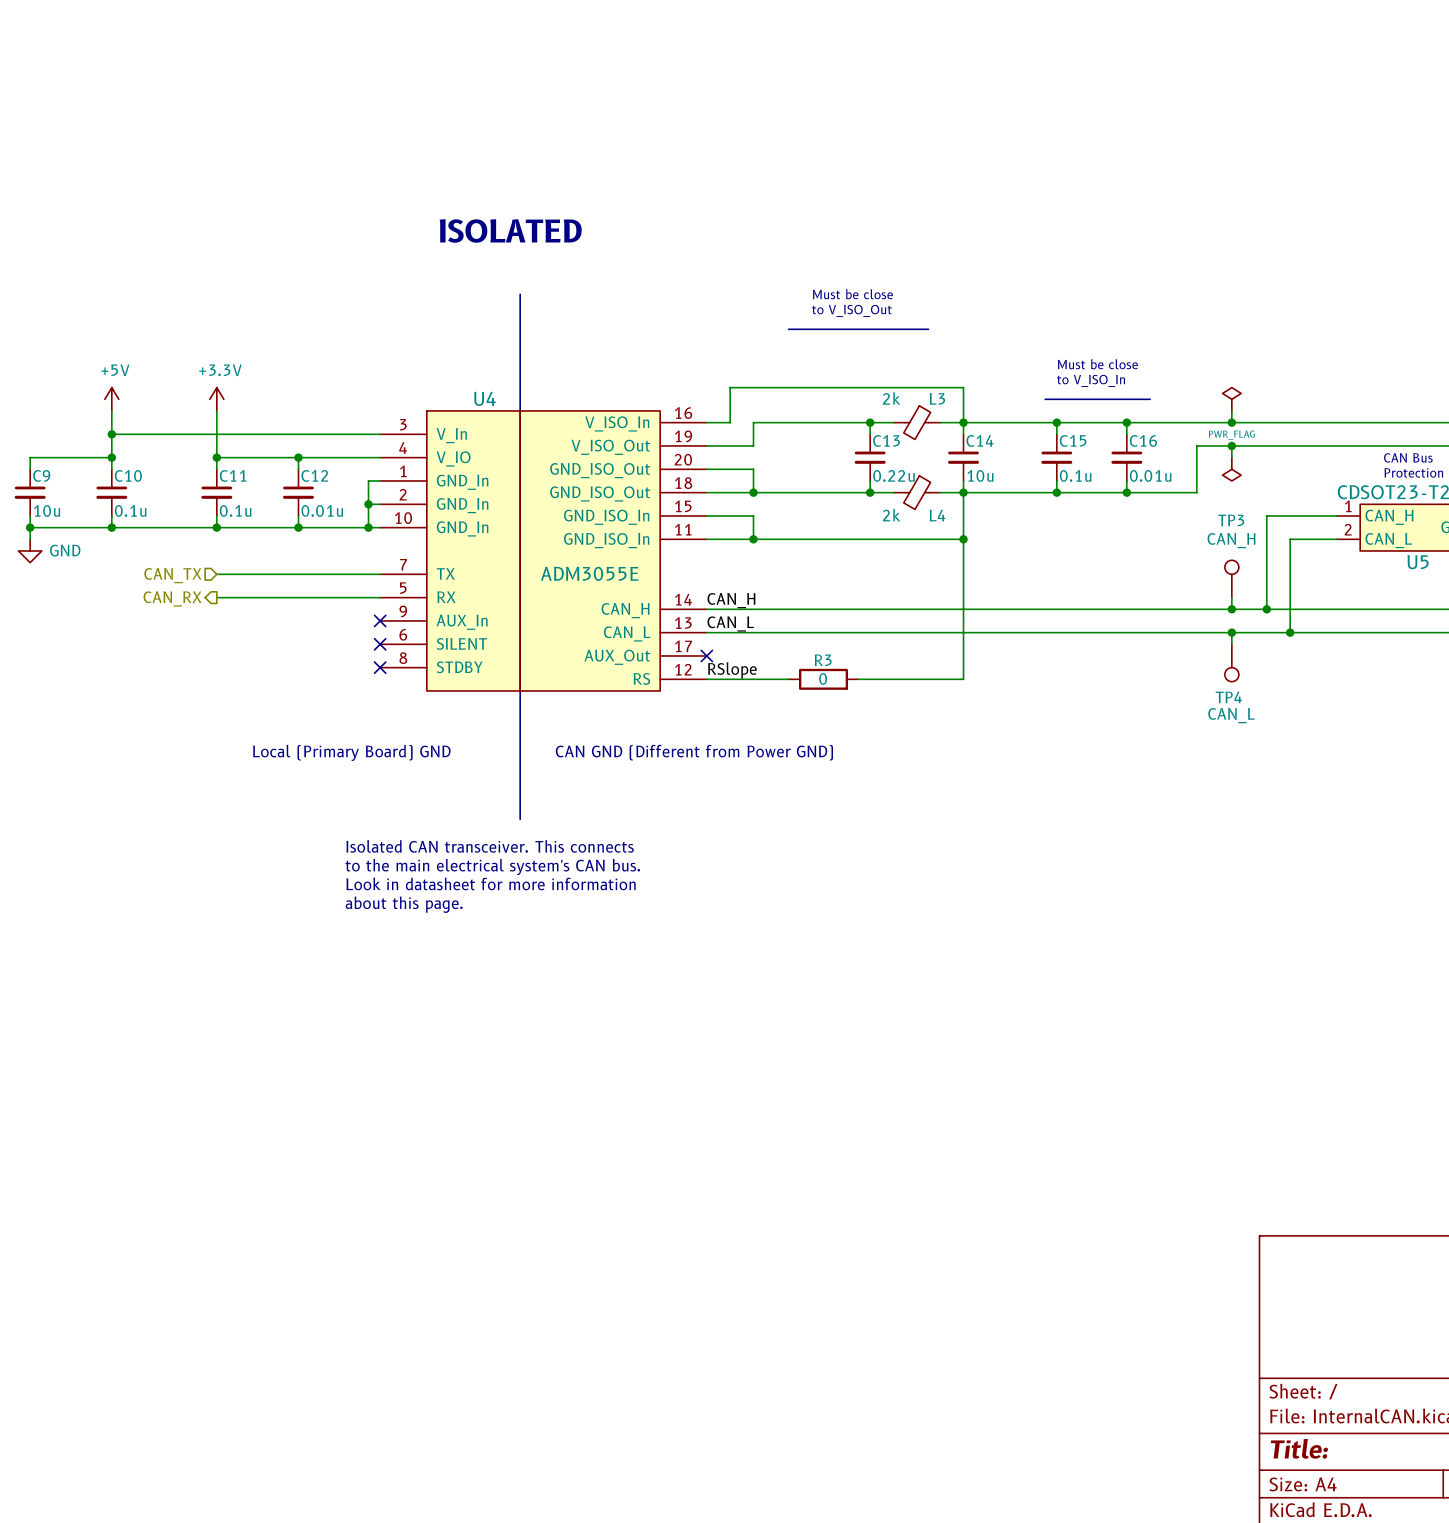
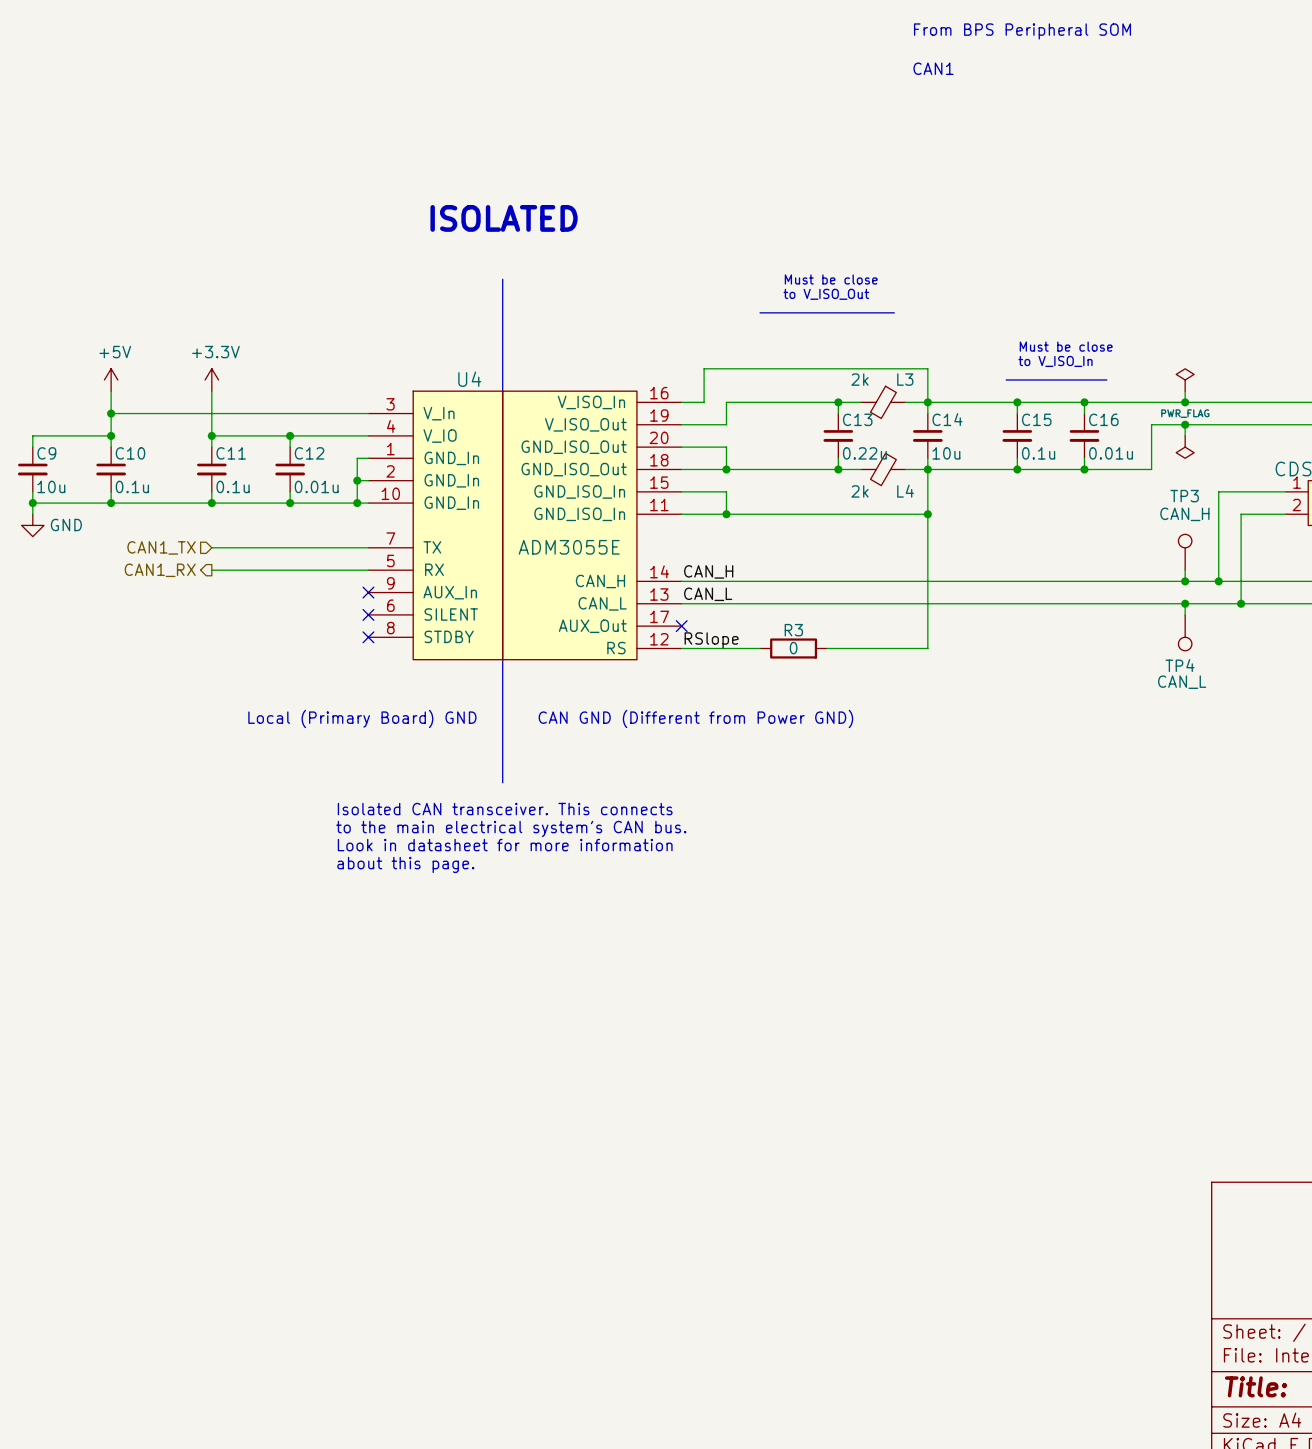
text: none -> From BPS Peripheral SOM (1022, 31)
text: none -> CAN1 (933, 68)
hierarchical label: CAN_TX (172, 575) -> CAN1_TX (161, 547)
hierarchical label: CAN_RX (172, 598) -> CAN1_RX (160, 570)

